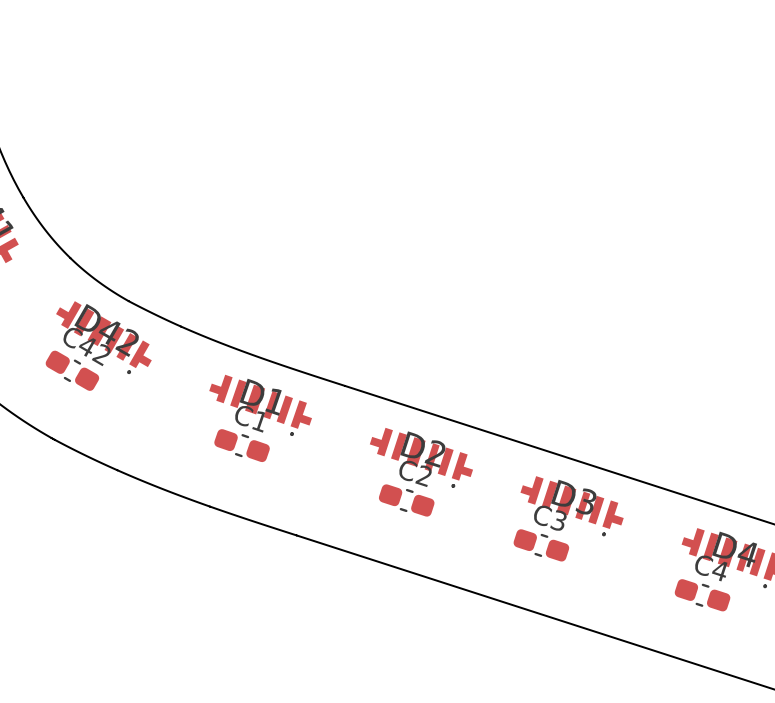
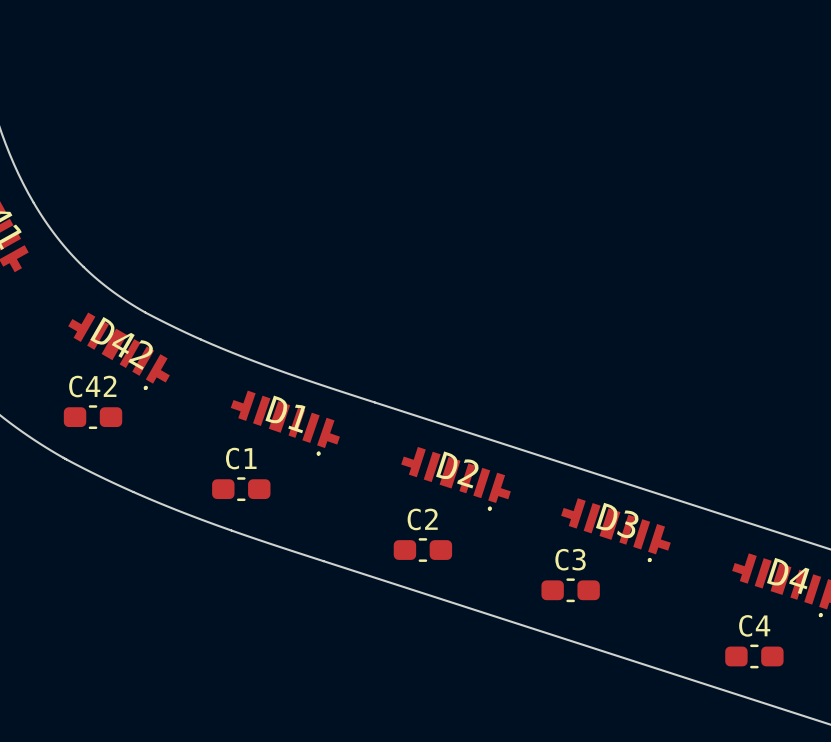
C42 rotation: 0° (72, 370) -> 30° counterclockwise (93, 417)
C1 rotation: 0° (242, 445) -> 19° counterclockwise (241, 489)
C2 rotation: 0° (406, 500) -> 18° counterclockwise (422, 550)
C3 rotation: 0° (541, 545) -> 18° counterclockwise (570, 590)
C4 rotation: 0° (702, 595) -> 18° counterclockwise (754, 656)

